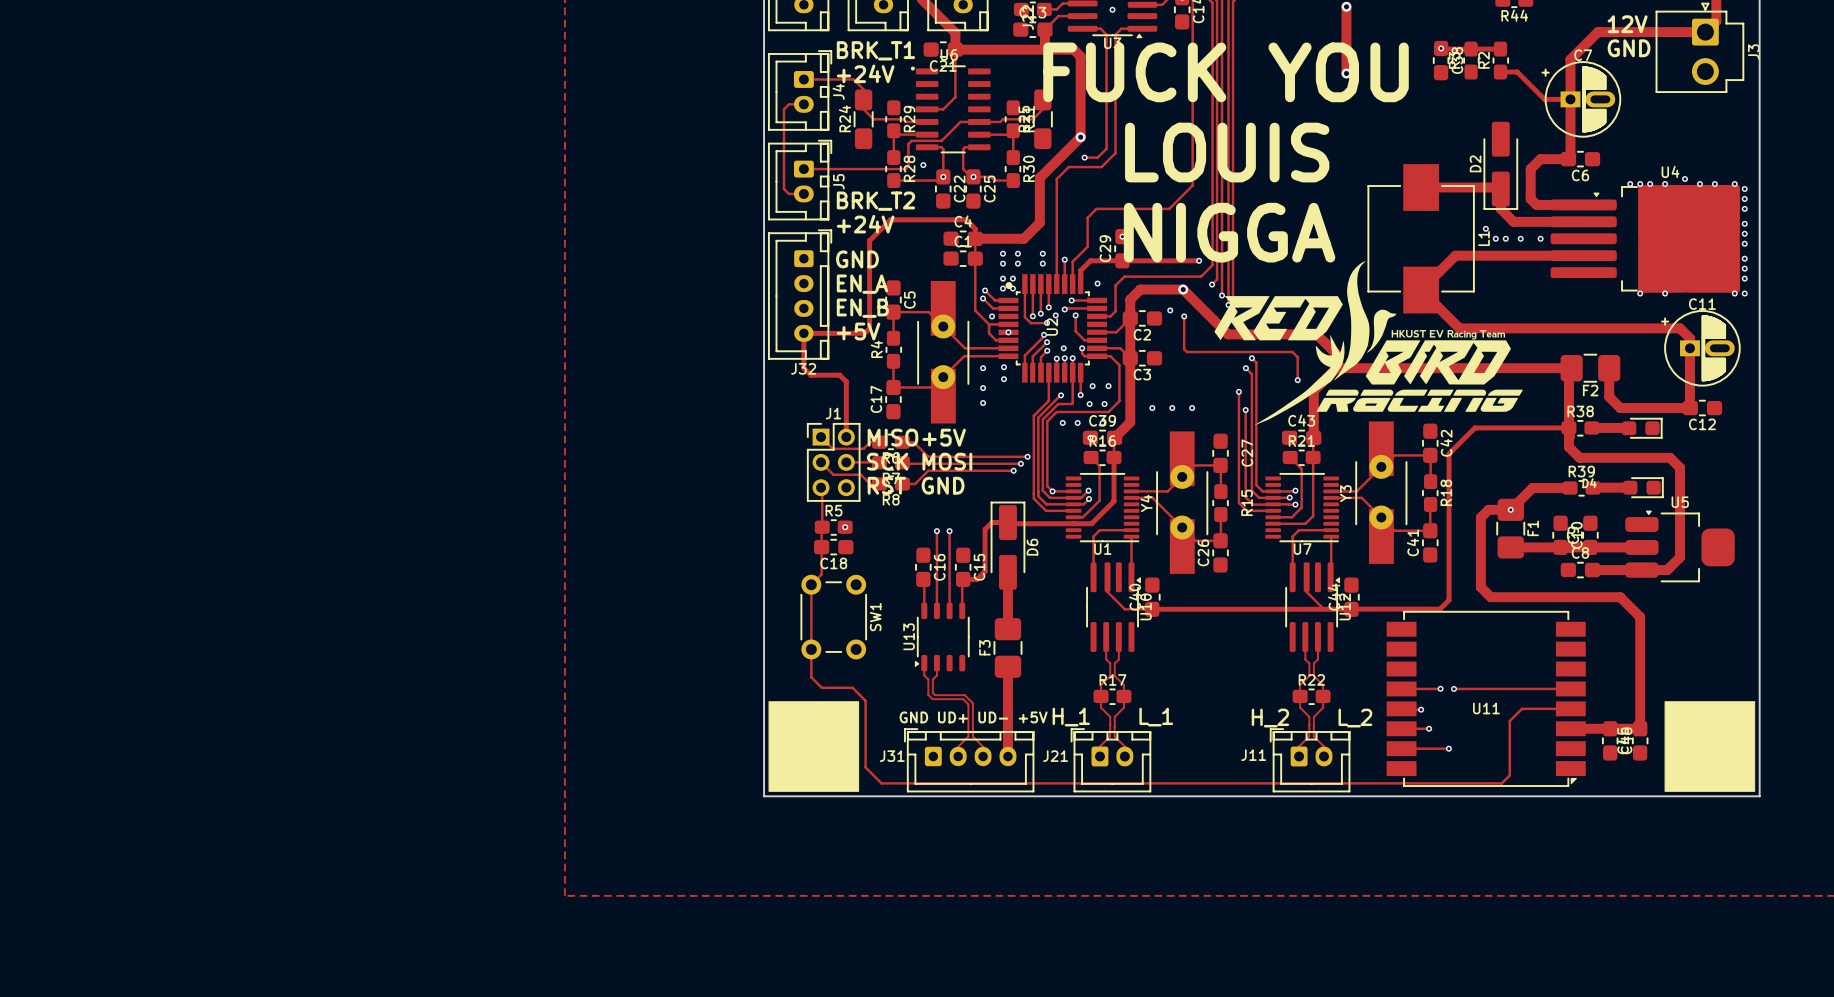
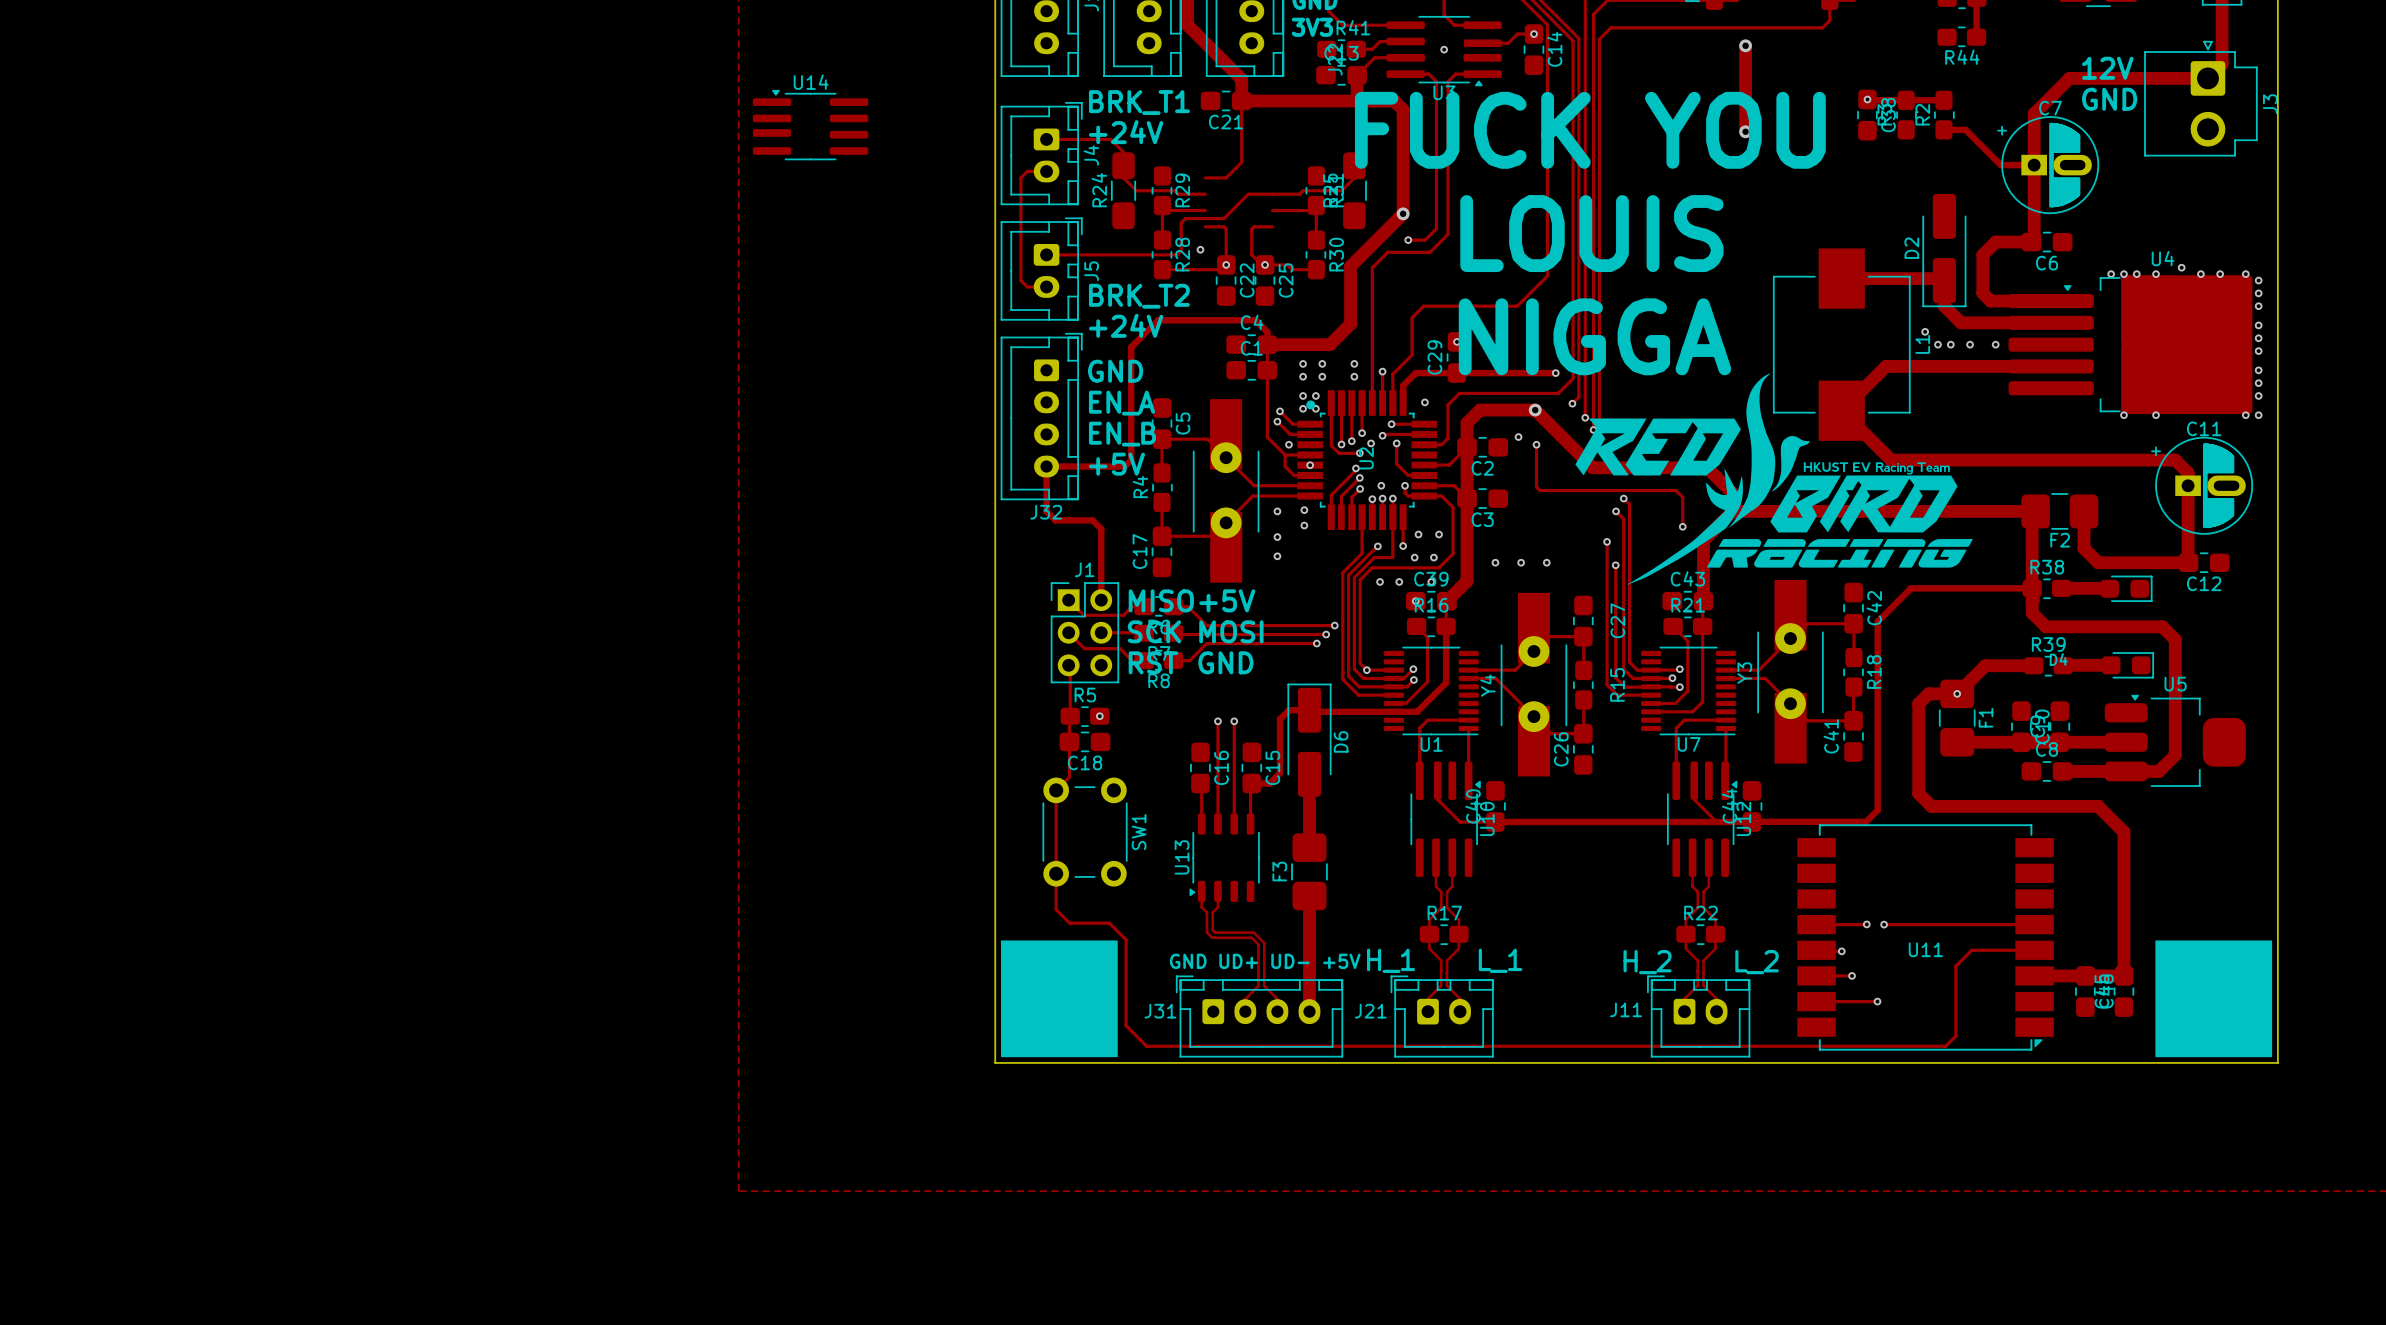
U14: none -> (810, 125)
U6: (950, 109) -> none

